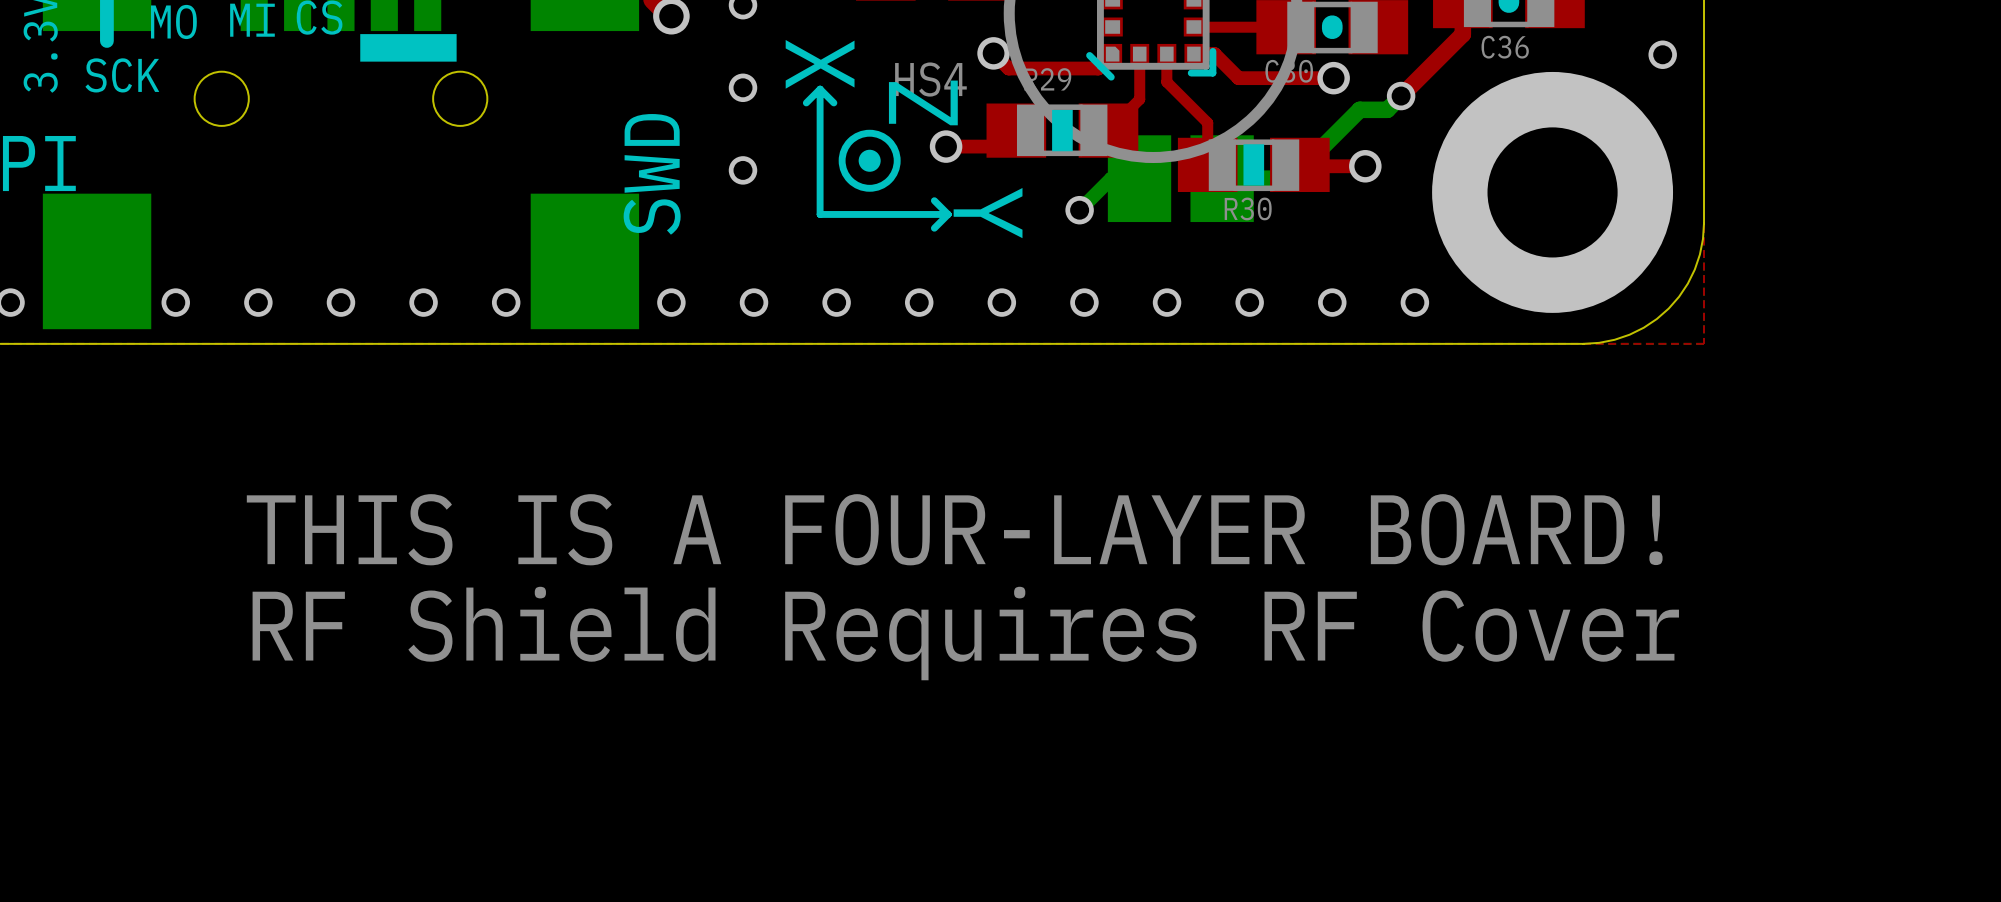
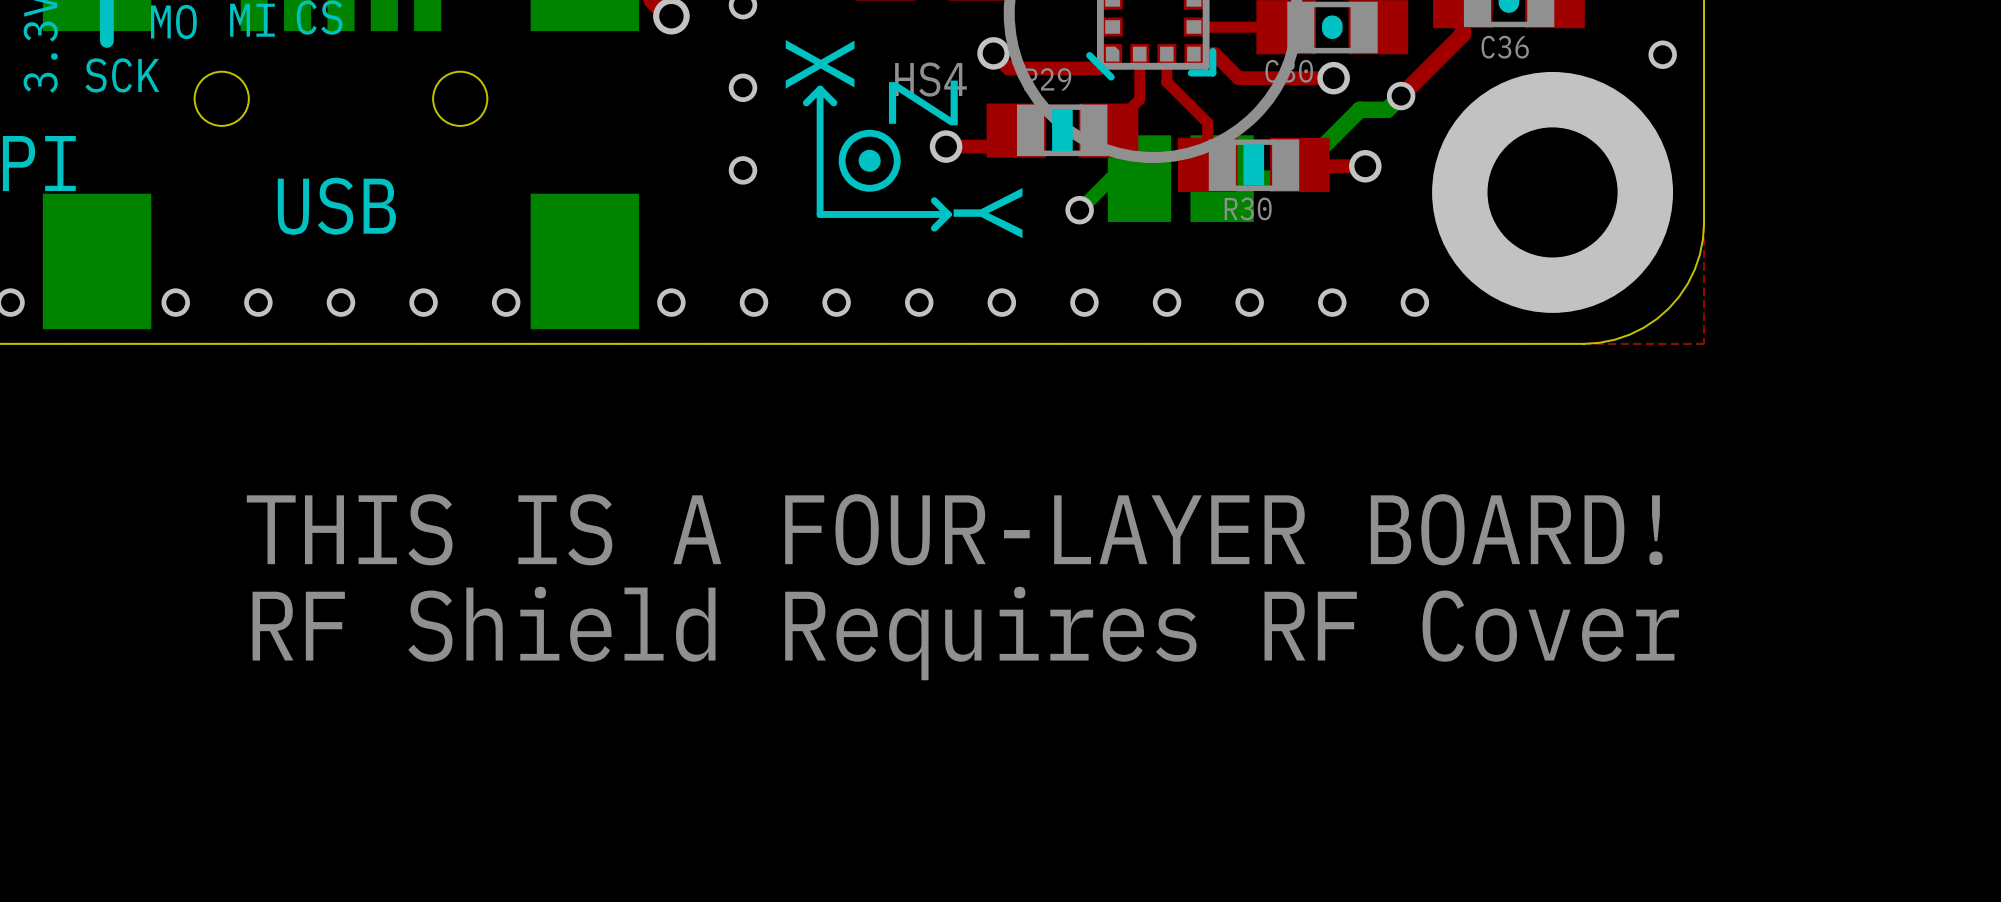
drawing: [360, 34, 457, 62] -> none
text: SWD (652, 174) -> none
text: none -> USB (336, 206)

